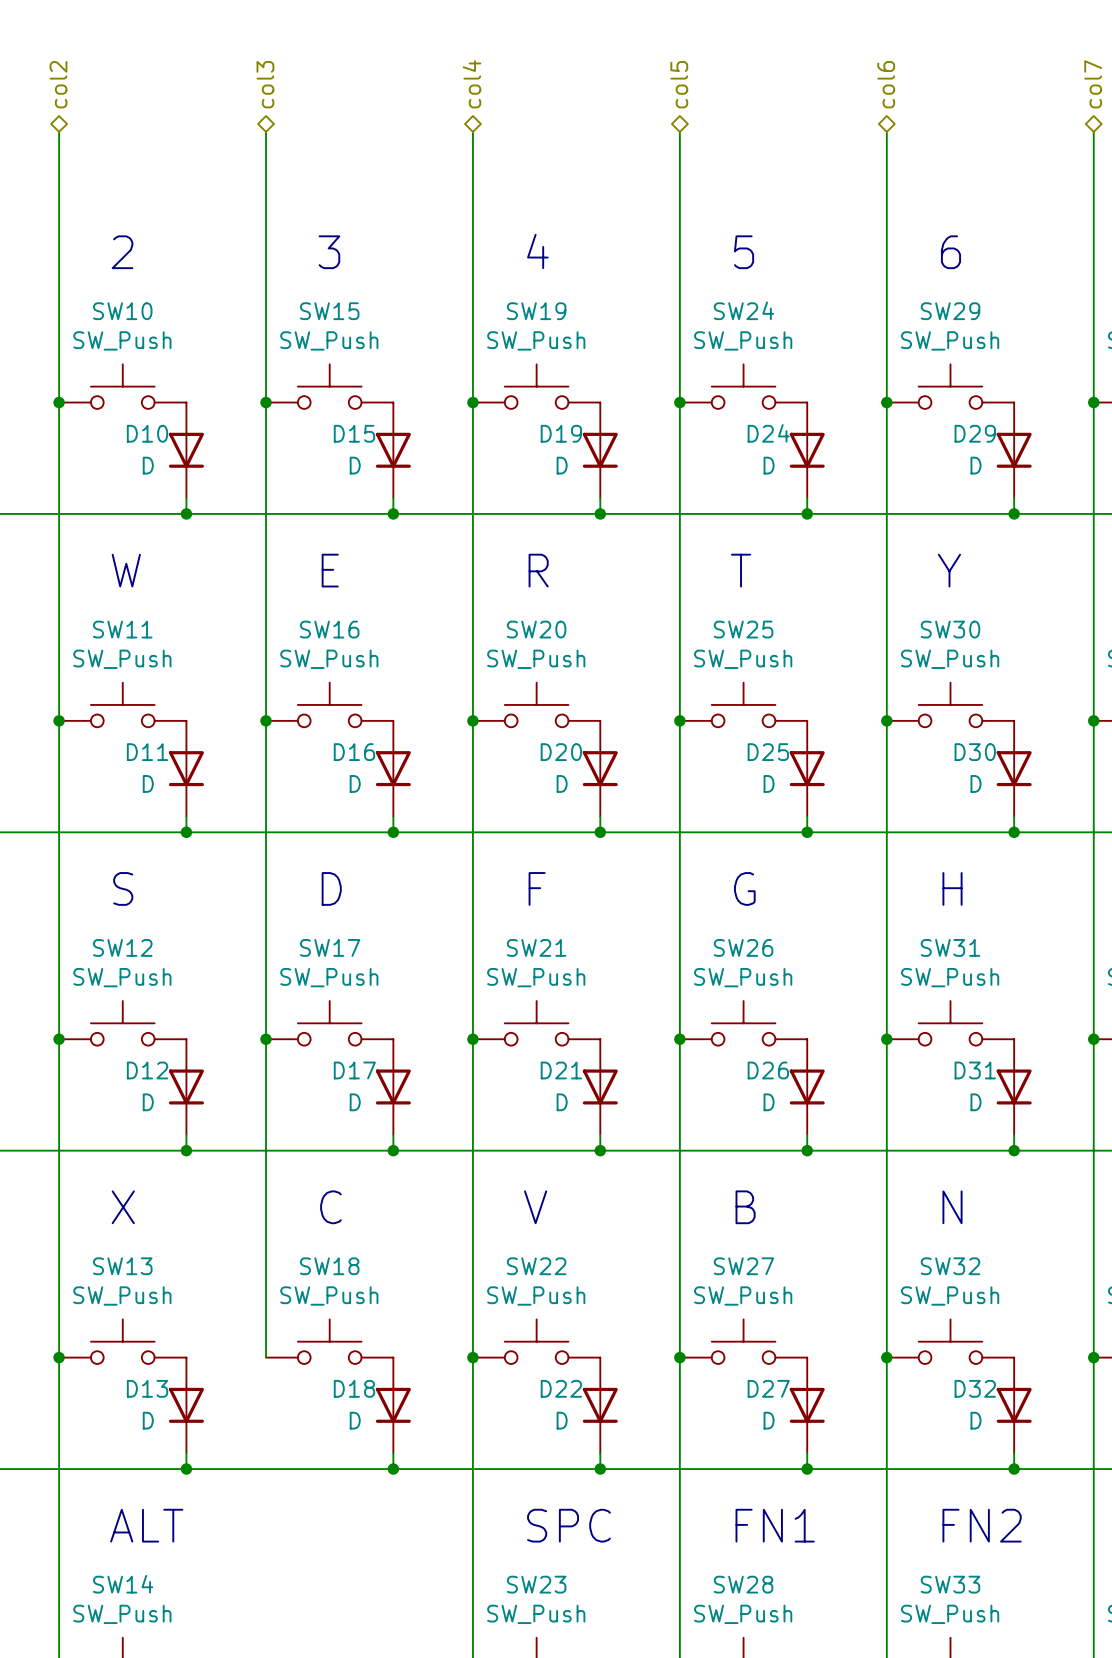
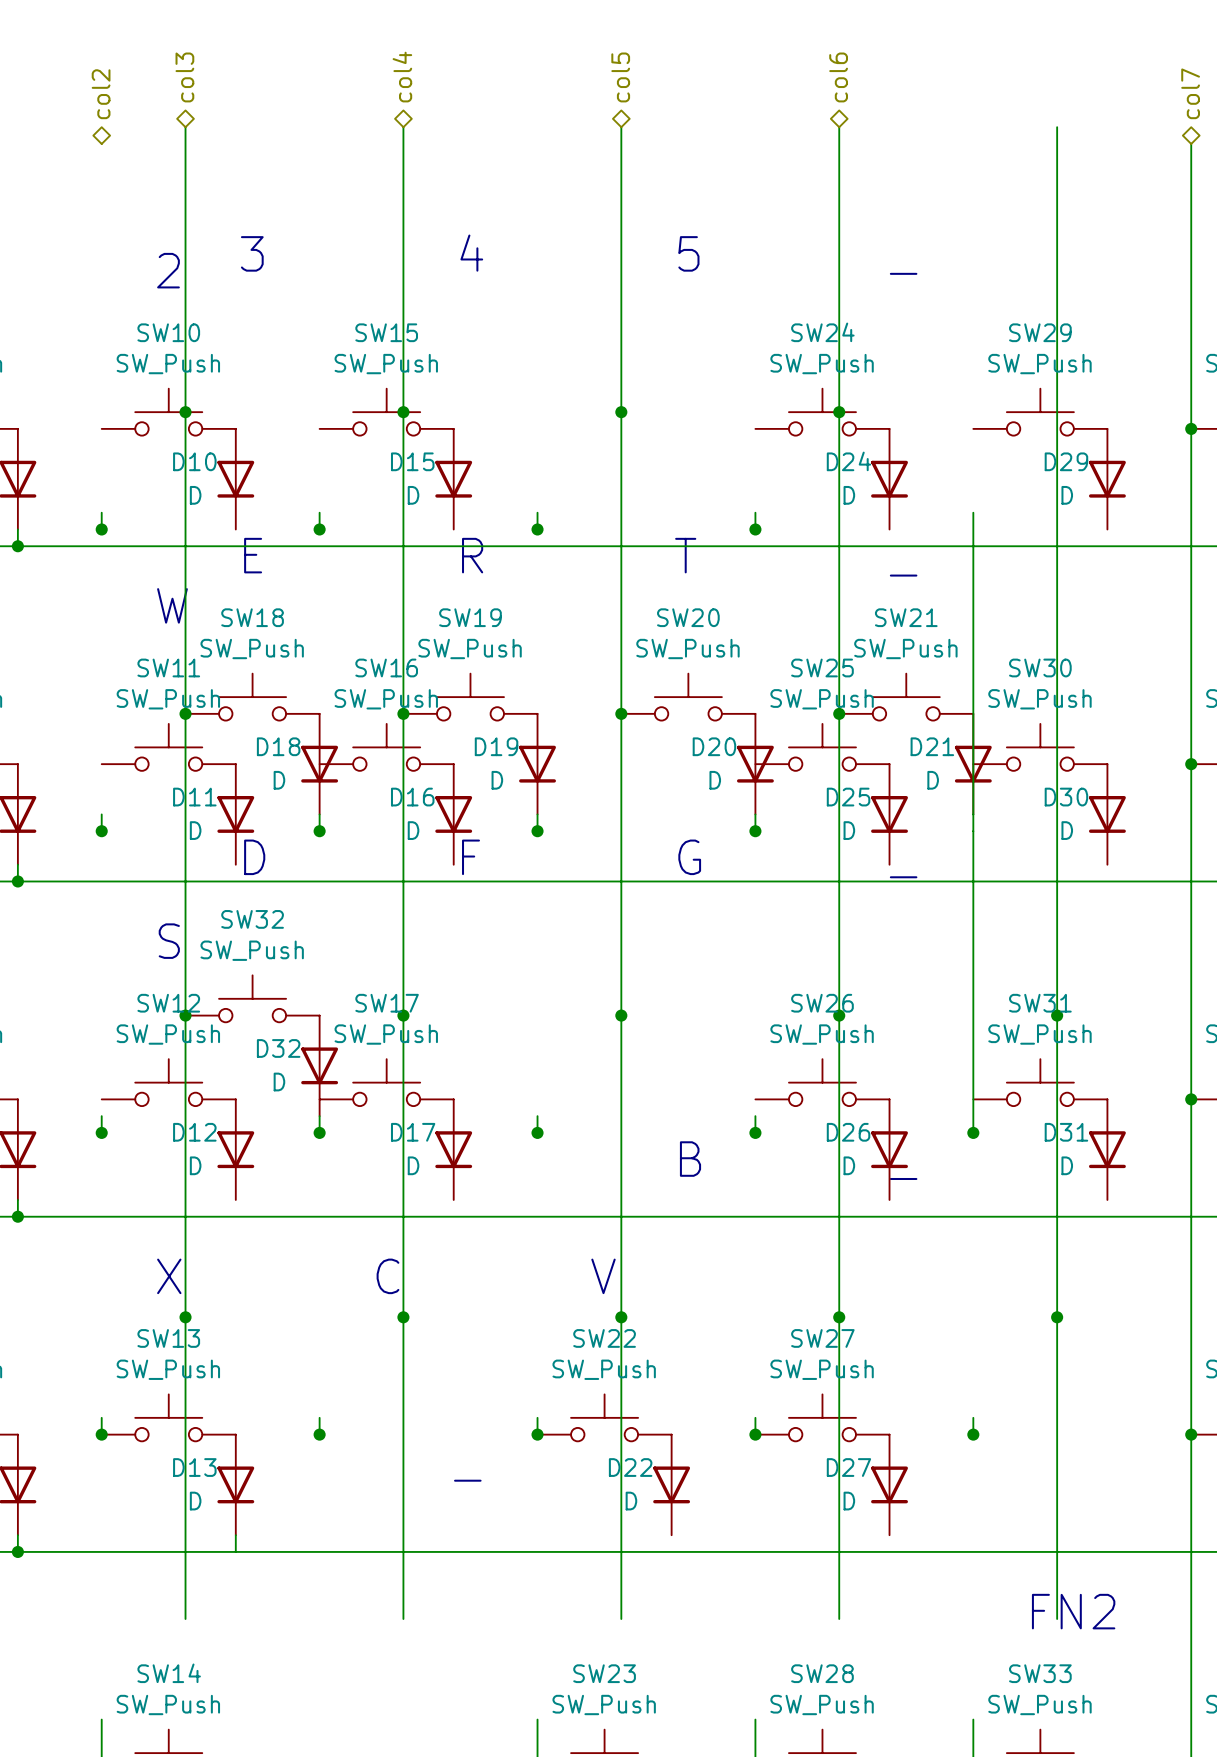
hierarchical label position: col3 (265, 84) -> col3 (184, 77)
hierarchical label position: col4 (471, 84) -> col4 (402, 77)
hierarchical label position: col5 (679, 84) -> col5 (620, 77)
hierarchical label position: col6 (886, 84) -> col6 (838, 77)
wire: none -> (185, 127) (185, 1619)
wire: none -> (403, 127) (403, 1619)
wire: none -> (621, 127) (621, 1619)
wire: none -> (839, 127) (839, 1619)
wire: none -> (1057, 127) (1057, 1619)
wire: (59, 131) (59, 482) -> none
wire: (266, 131) (266, 482) -> none
wire: (472, 131) (472, 482) -> none
wire: (679, 131) (679, 482) -> none
wire: (886, 131) (886, 482) -> none
text position: 4 (537, 251) -> 4 (471, 253)
text position: 3 (329, 252) -> 3 (252, 253)
text position: 5 (744, 252) -> 5 (688, 253)
text: 6 (950, 252) -> none
text: none -> _ (903, 273)
junction: none -> (185, 412)
junction: none -> (403, 412)
SW19 position: (536, 386) -> (470, 697)
junction: none -> (621, 412)
junction: none -> (839, 412)
junction: (59, 402) -> none
junction: (266, 402) -> none
junction: (472, 402) -> none
junction: (679, 402) -> none
junction: (886, 402) -> none
D19 position: (600, 450) -> (537, 764)
wire: (59, 498) (59, 768) -> none
junction: none -> (101, 529)
wire: (186, 498) (186, 513) -> none
wire: (266, 498) (266, 768) -> none
junction: none -> (319, 529)
wire: (393, 498) (393, 513) -> none
wire: (472, 498) (472, 768) -> none
junction: none -> (537, 529)
wire: (600, 498) (600, 513) -> none
wire: (679, 498) (679, 768) -> none
junction: none -> (755, 529)
wire: (807, 498) (807, 513) -> none
wire: (1014, 498) (1014, 513) -> none
junction: (186, 513) -> none
junction: (393, 513) -> none
junction: (600, 513) -> none
junction: (807, 513) -> none
junction: (1014, 513) -> none
text: none -> _ (903, 575)
text position: E (330, 570) -> E (253, 555)
text position: R (538, 570) -> R (472, 555)
text position: T (741, 570) -> T (685, 555)
text: Y (949, 570) -> none
junction: none -> (185, 713)
junction: none -> (403, 713)
junction: none -> (621, 713)
junction: none -> (839, 713)
SW20 position: (536, 704) -> (688, 697)
junction: (59, 720) -> none
junction: (266, 720) -> none
junction: (472, 720) -> none
junction: (679, 720) -> none
junction: (886, 720) -> none
D20 position: (600, 768) -> (755, 764)
wire: (59, 784) (59, 1055) -> none
junction: none -> (101, 831)
wire: (266, 784) (266, 1055) -> none
junction: none -> (319, 831)
wire: (472, 784) (472, 1055) -> none
junction: none -> (537, 831)
wire: (679, 784) (679, 1055) -> none
junction: none -> (755, 831)
wire: (186, 816) (186, 832) -> none
wire: (393, 816) (393, 832) -> none
wire: (600, 816) (600, 832) -> none
wire: (807, 816) (807, 832) -> none
wire: (1014, 816) (1014, 832) -> none
text: none -> _ (903, 877)
junction: (186, 832) -> none
junction: (393, 832) -> none
junction: (600, 832) -> none
junction: (807, 832) -> none
junction: (1014, 832) -> none
text position: D (331, 888) -> D (254, 857)
text position: F (537, 888) -> F (471, 857)
text position: G (744, 888) -> G (689, 857)
text: H (952, 888) -> none
junction: none -> (185, 1015)
junction: none -> (403, 1015)
junction: none -> (621, 1015)
junction: none -> (839, 1015)
junction: none -> (1057, 1015)
SW21 position: (536, 1023) -> (906, 697)
junction position: (59, 1039) -> (101, 1132)
junction position: (266, 1039) -> (319, 1132)
junction position: (472, 1039) -> (537, 1132)
junction position: (679, 1039) -> (755, 1132)
junction position: (886, 1039) -> (973, 1132)
wire: (59, 1071) (59, 1341) -> none
wire: (266, 1071) (266, 1341) -> none
wire: (472, 1071) (472, 1341) -> none
wire: (679, 1071) (679, 1341) -> none
wire: (886, 1071) (886, 1341) -> none
D21 position: (600, 1086) -> (973, 764)
text: none -> _ (903, 1178)
wire: (186, 1134) (186, 1150) -> none
wire: (393, 1134) (393, 1150) -> none
wire: (600, 1134) (600, 1150) -> none
wire: (807, 1134) (807, 1150) -> none
wire: (1014, 1134) (1014, 1150) -> none
junction: (186, 1150) -> none
junction: (393, 1150) -> none
junction: (600, 1150) -> none
junction: (807, 1150) -> none
junction: (1014, 1150) -> none
text position: B (745, 1207) -> B (690, 1159)
text: N (952, 1207) -> none
junction: none -> (185, 1317)
junction: none -> (403, 1317)
junction: none -> (621, 1317)
junction: none -> (839, 1317)
junction: none -> (1057, 1317)
SW18 position: (329, 1341) -> (252, 697)
SW32 position: (950, 1341) -> (252, 998)
wire: (59, 1357) (59, 1628) -> none
junction: none -> (319, 1434)
wire: (472, 1357) (472, 1628) -> none
wire: (679, 1357) (679, 1628) -> none
wire: (886, 1357) (886, 1628) -> none
text: none -> _ (467, 1480)
D18 position: (393, 1405) -> (319, 764)
D32 position: (1014, 1405) -> (319, 1065)
wire: (393, 1453) (393, 1469) -> none
wire: (600, 1453) (600, 1469) -> none
wire: (807, 1453) (807, 1469) -> none
wire: (1014, 1453) (1014, 1469) -> none
junction: (186, 1469) -> none
junction: (393, 1469) -> none
junction: (600, 1469) -> none
junction: (807, 1469) -> none
junction: (1014, 1469) -> none
text: ALT (146, 1525) -> none
text: SPC (568, 1525) -> none
text: FN1 (775, 1525) -> none

